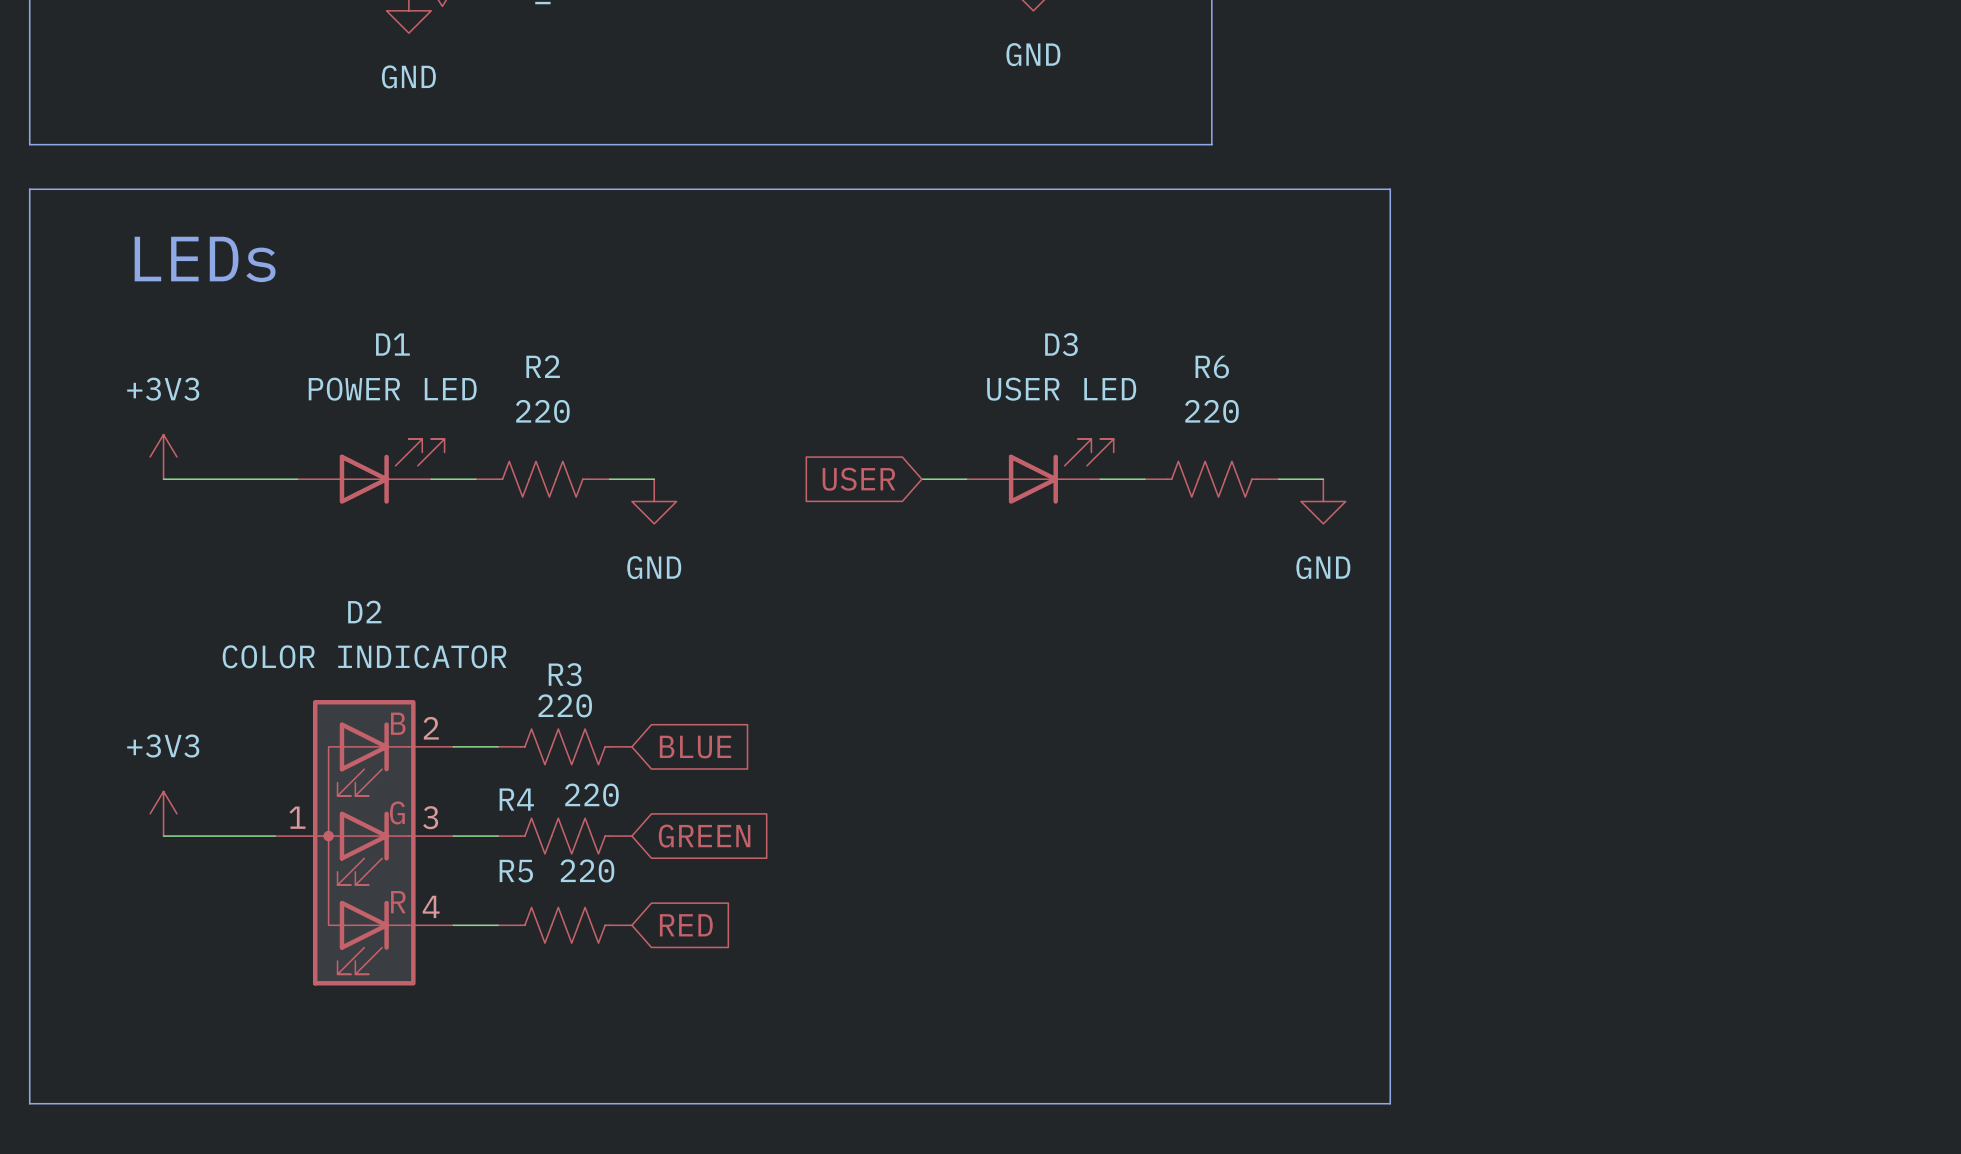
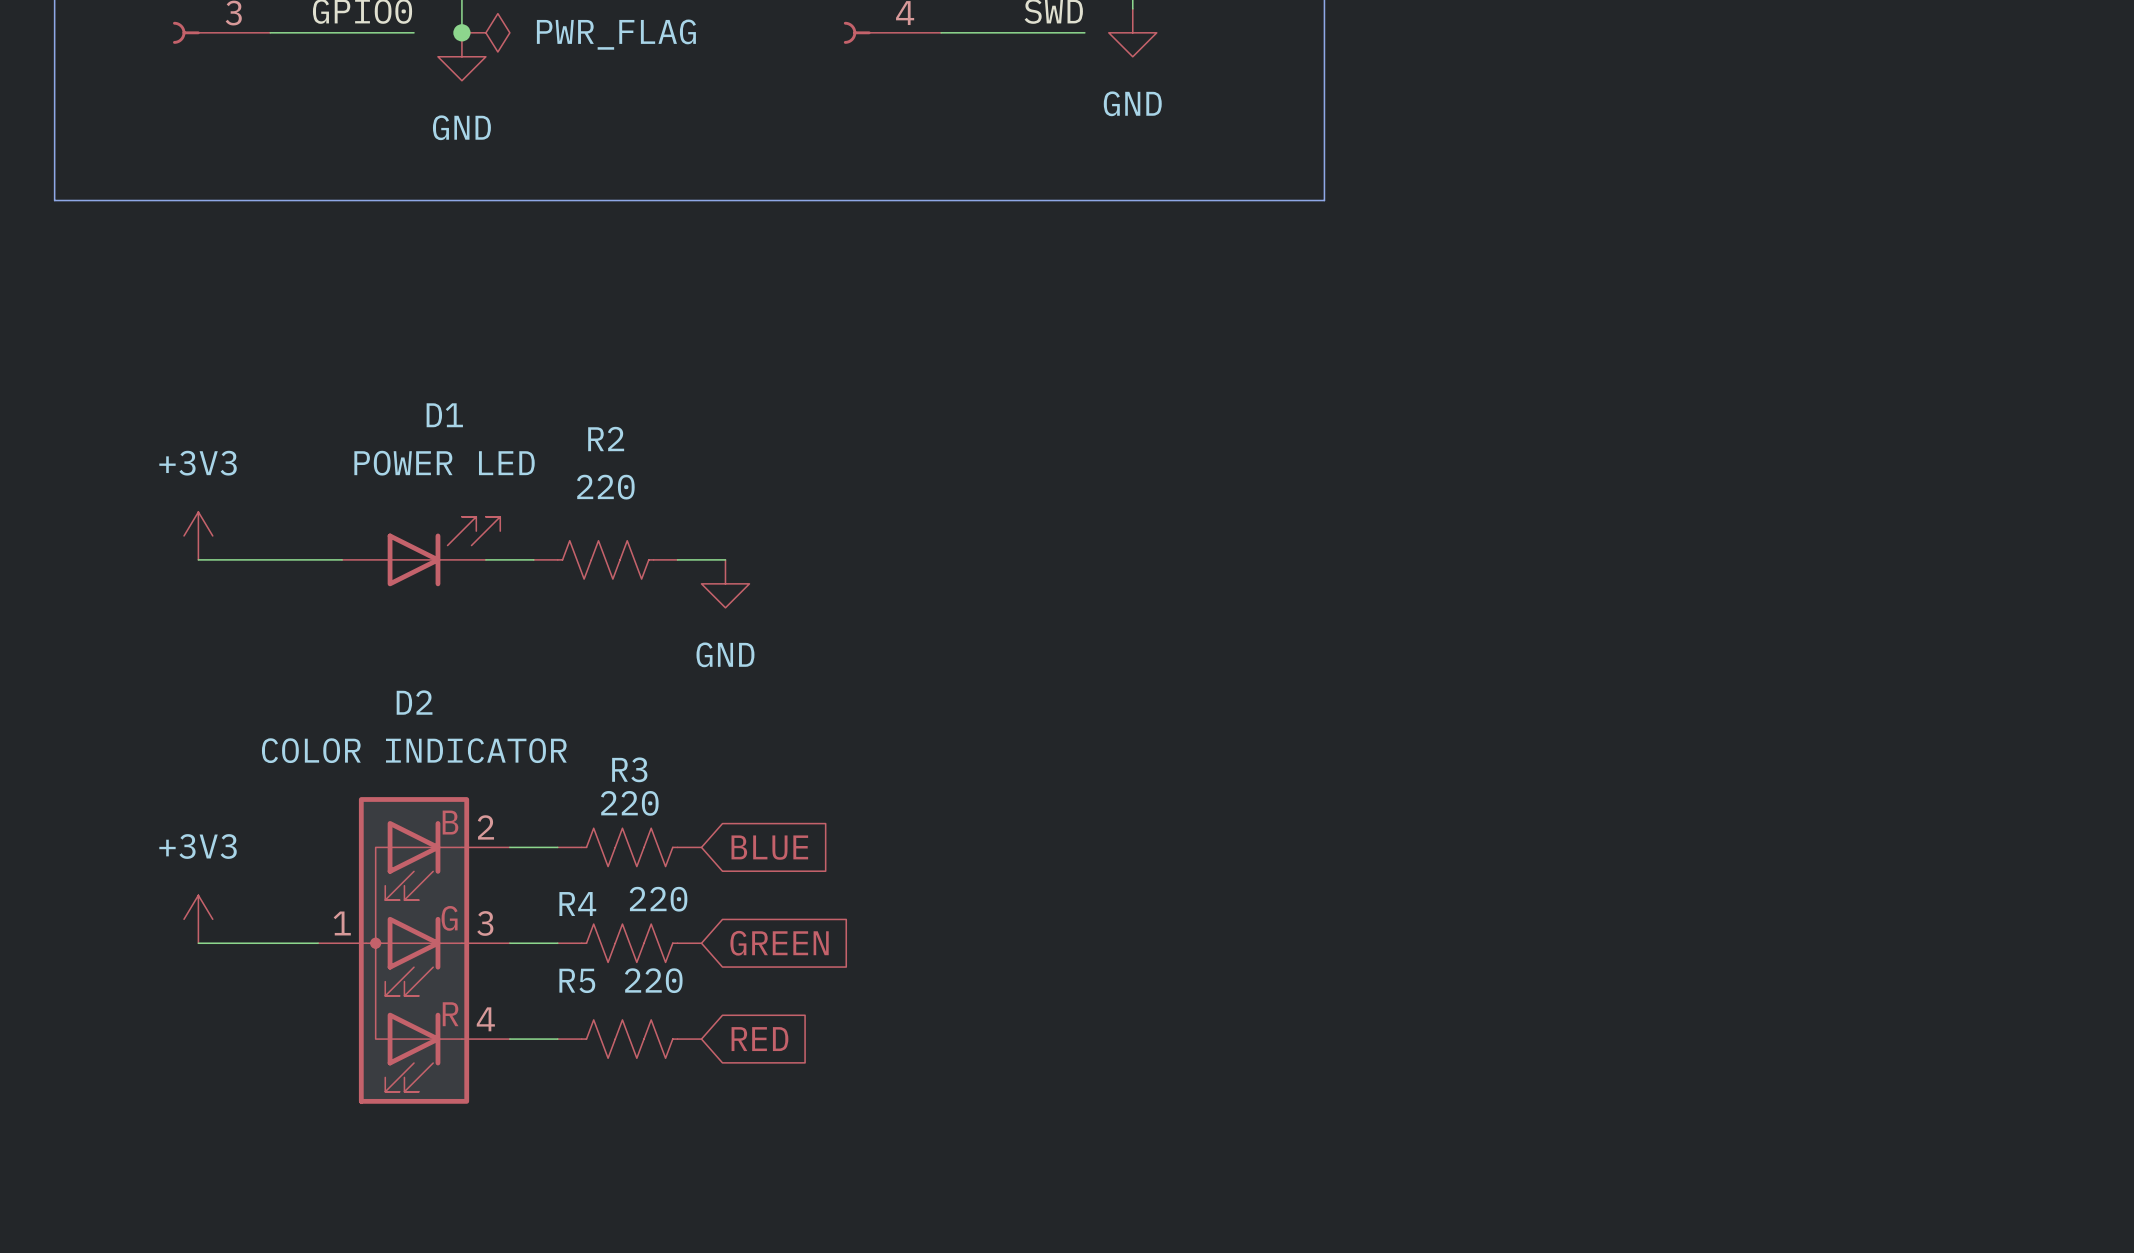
line: (29, 189) (1390, 189) (1390, 1103) (29, 1103) (29, 189) -> none
text: LEDs (205, 259) -> none
D3: USER LED (1040, 471) -> none
global label: USER (858, 479) -> none
wire: (921, 479) (966, 479) -> none
wire: (1100, 479) (1144, 479) -> none
R6: 220 (1211, 479) -> none
wire: (1278, 479) (1323, 479) -> none
power symbol: GND (1323, 501) -> none

